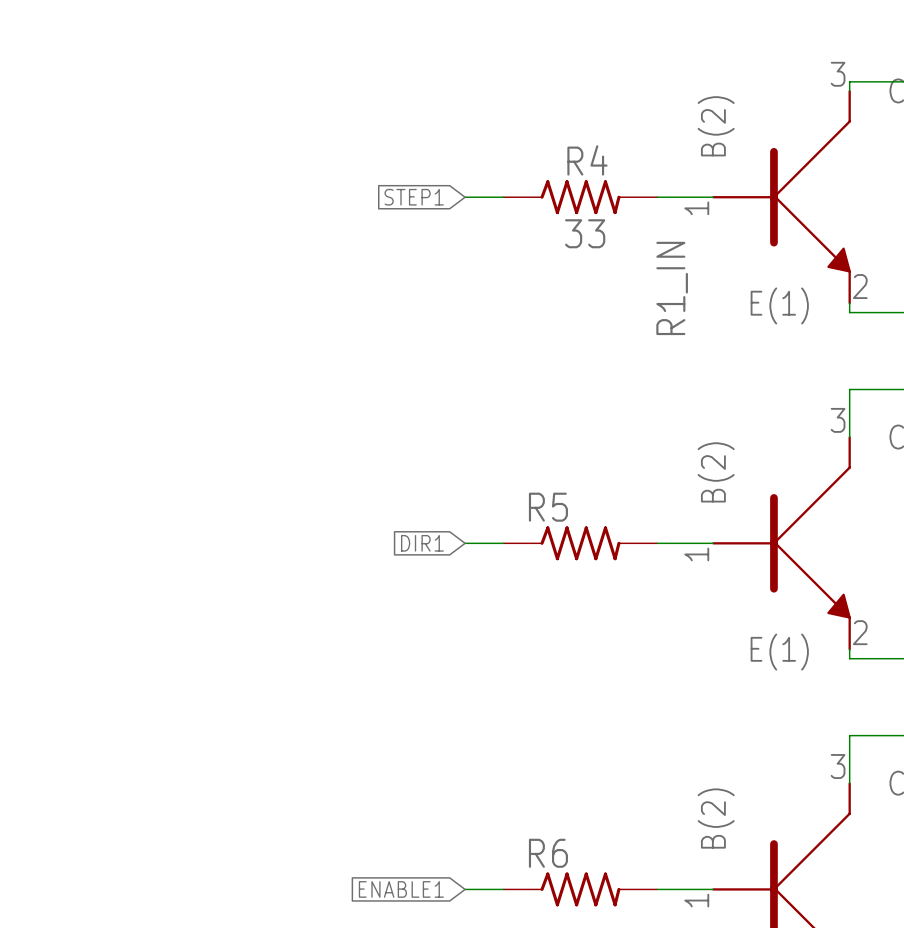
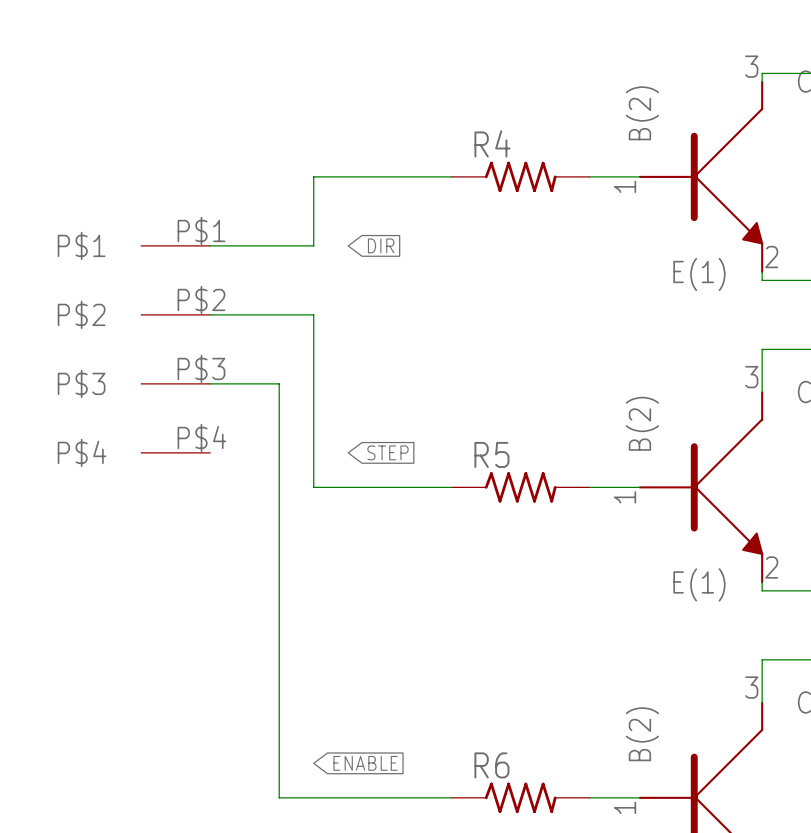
R4 name position: R4 (587, 160) -> R4 (492, 143)
global label: STEP1 (414, 197) -> none
wire: none -> (417, 176) (313, 176) (313, 245) (210, 245)
R4 value: 33 (585, 233) -> none
global label: none -> DIR (381, 245)
label: R1_IN (672, 288) -> none
wire: none -> (210, 314) (313, 314) (313, 487) (417, 487)
part: none -> (175, 349)
wire: none -> (210, 383) (279, 383) (279, 797) (417, 797)
global label: none -> STEP (387, 452)
global label: DIR1 (422, 543) -> none
global label: none -> ENABLE (365, 763)
global label: ENABLE1 (401, 889) -> none

